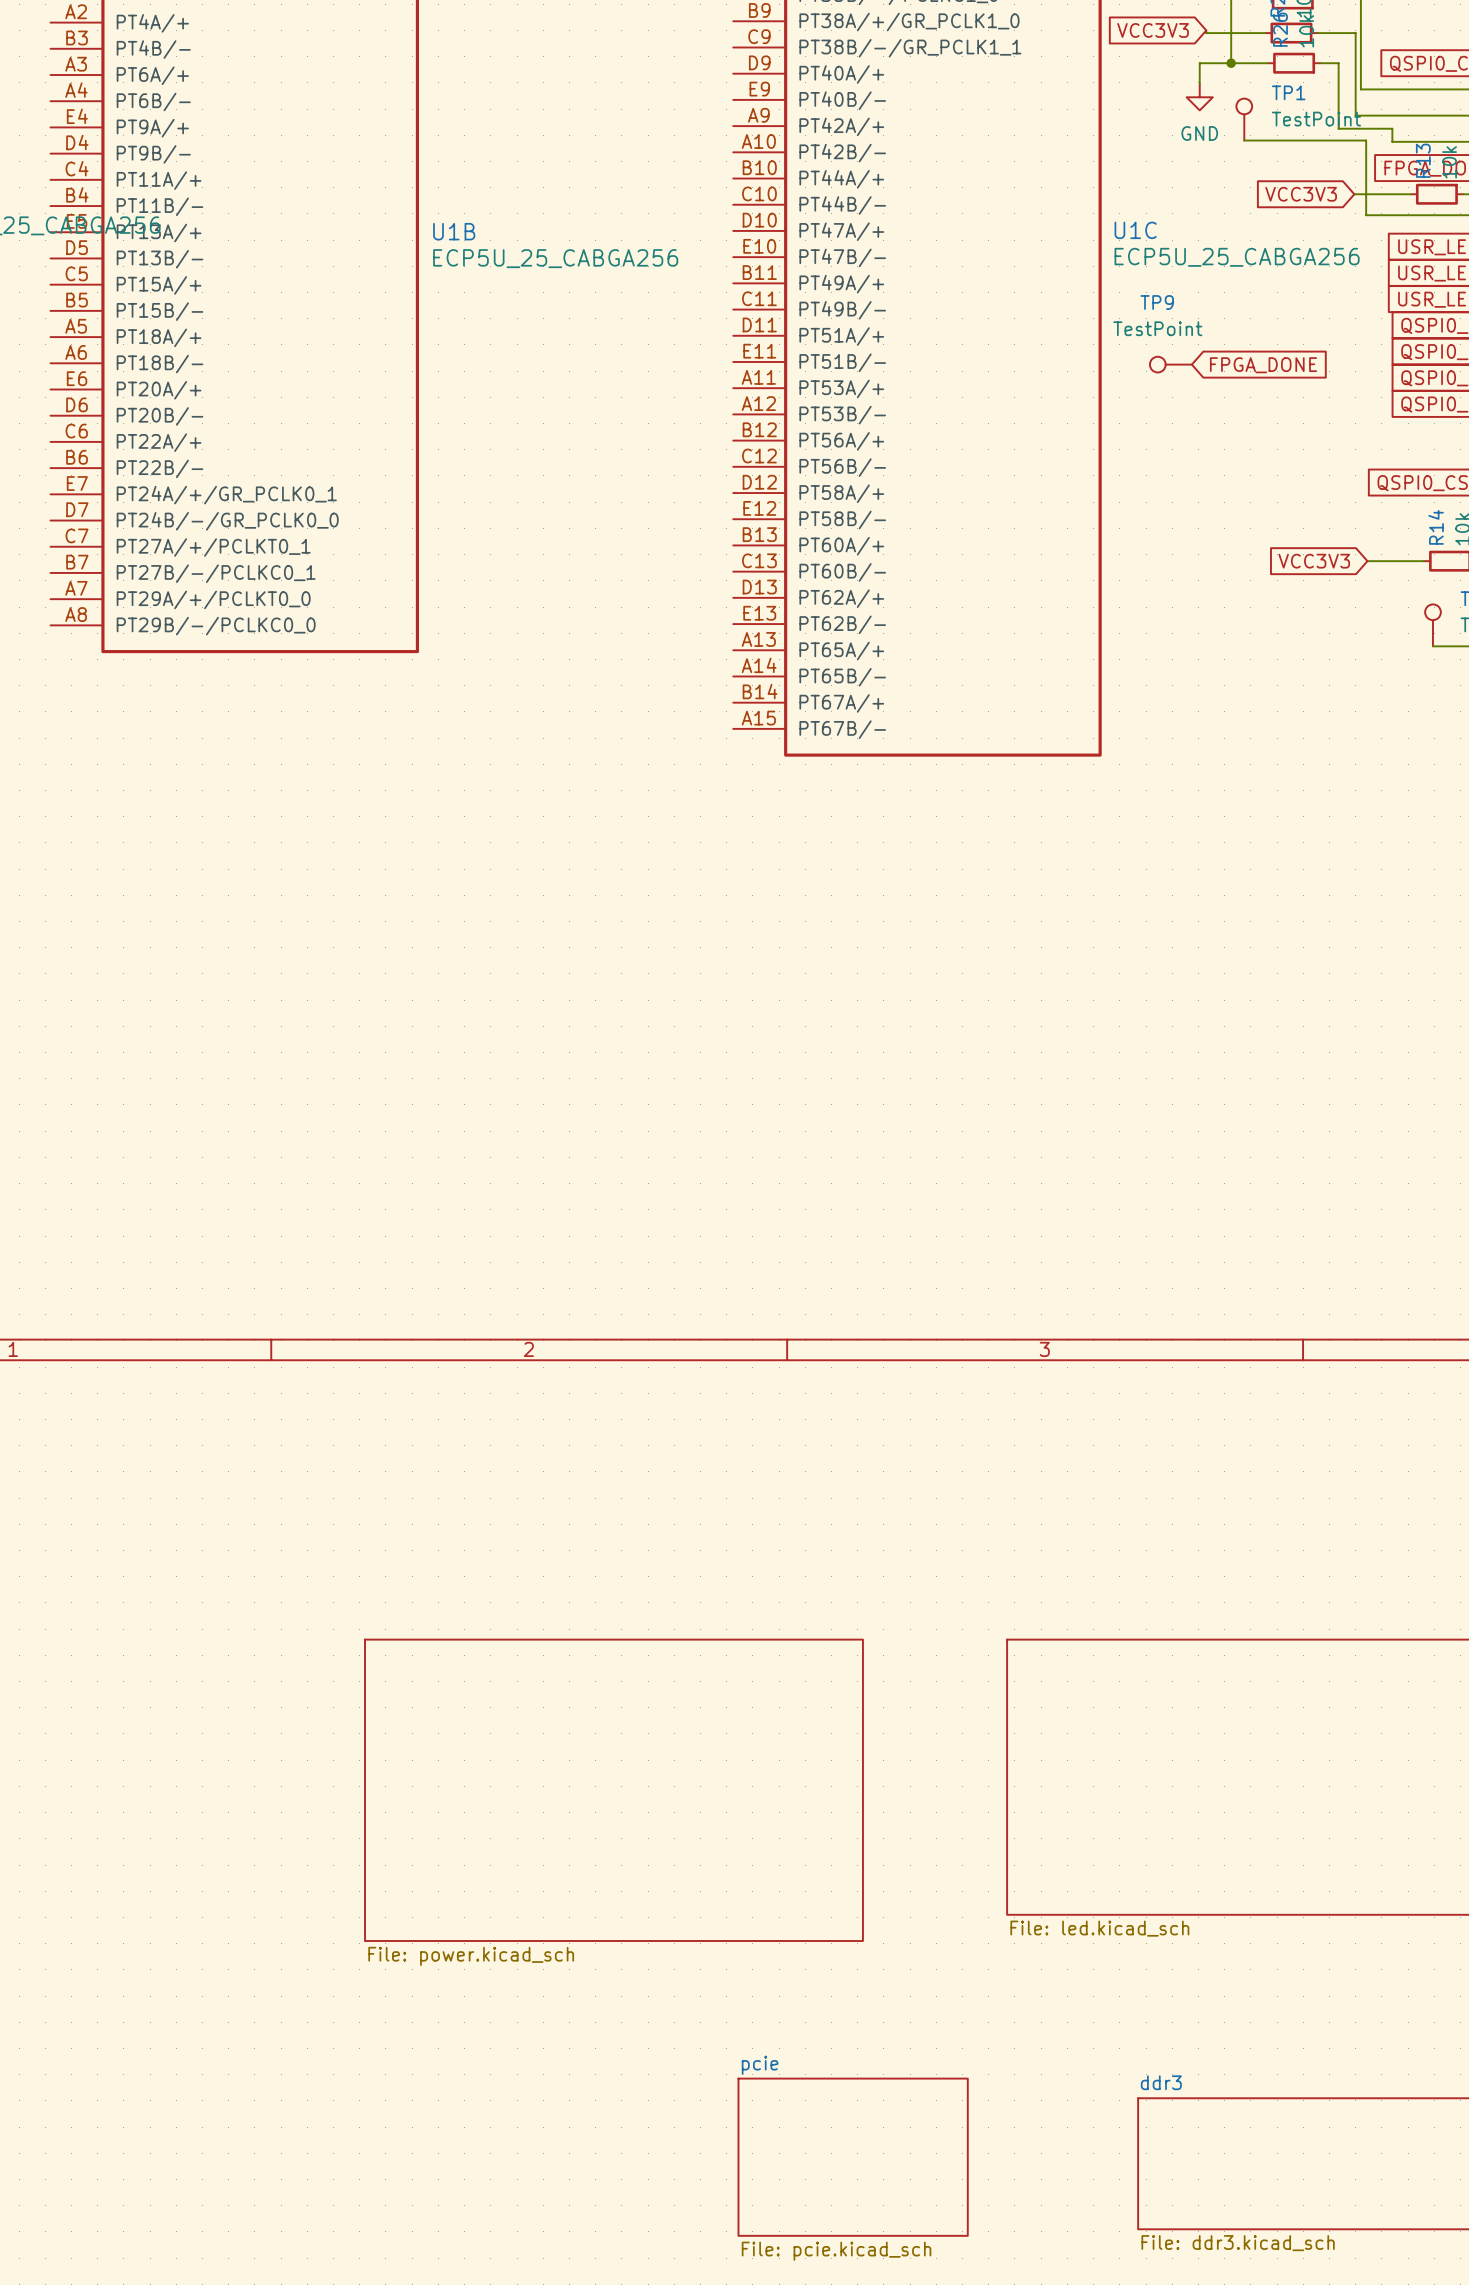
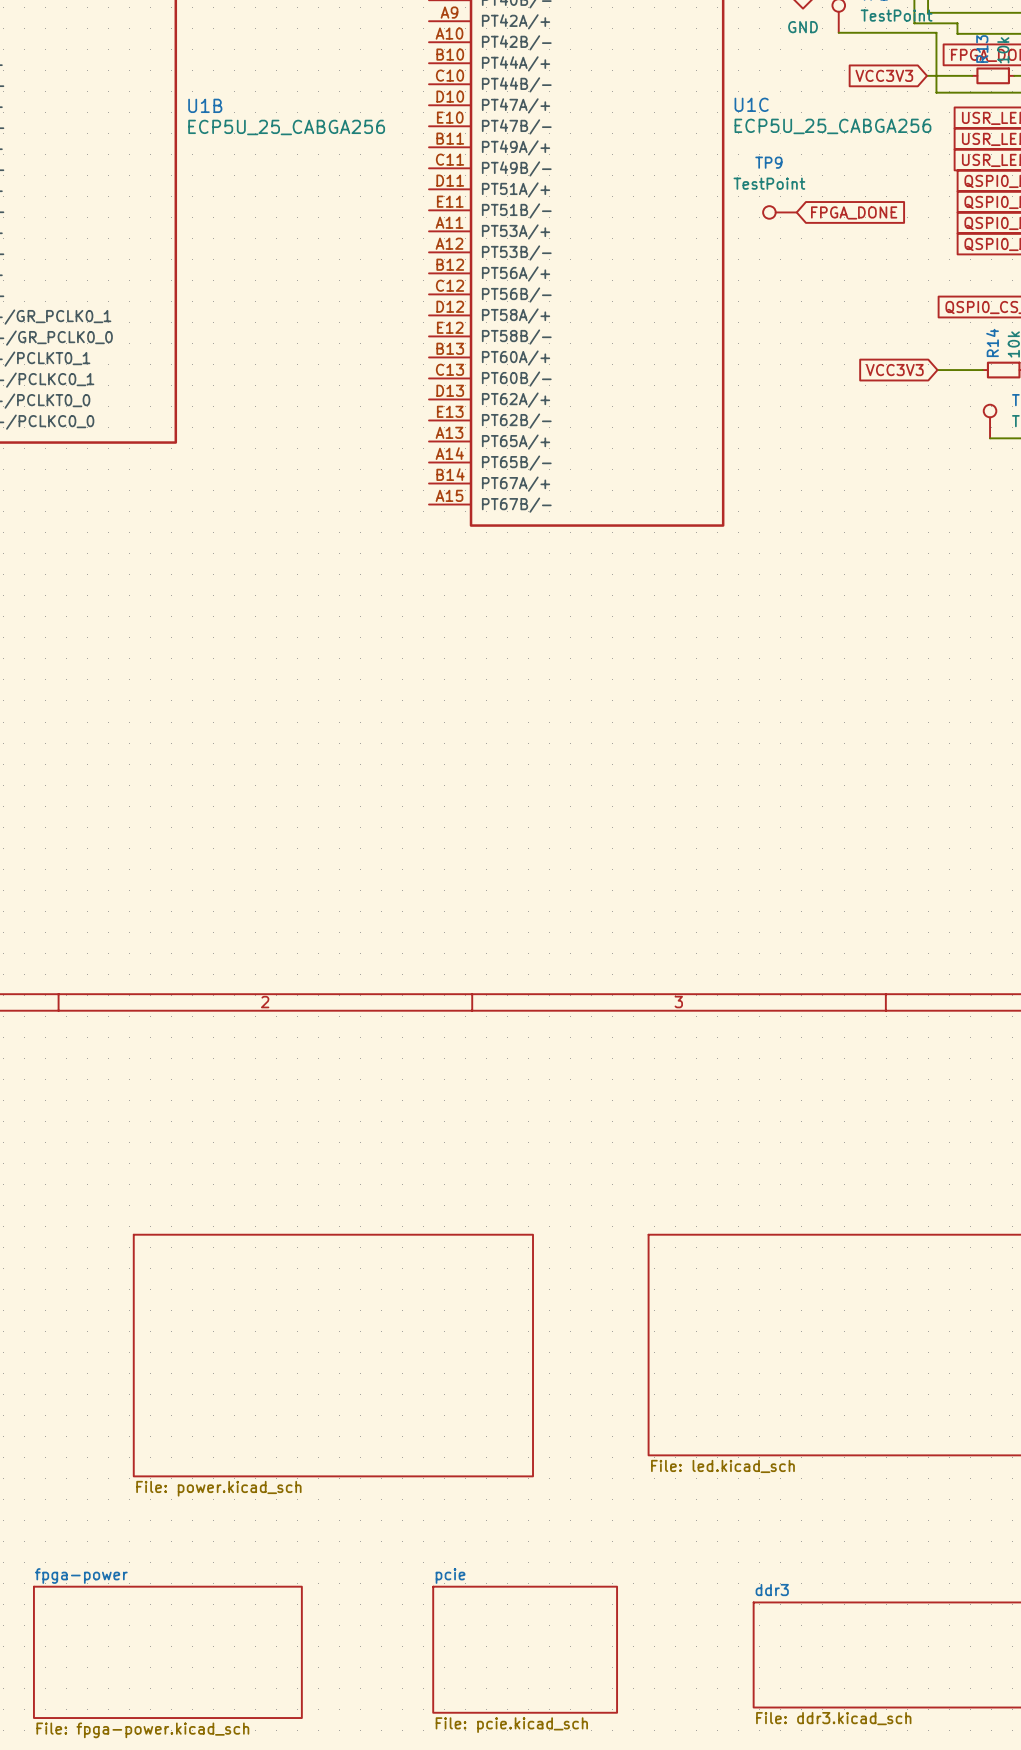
sheet fpga-power: none -> File: fpga-power.kicad_sch (167, 1652)

